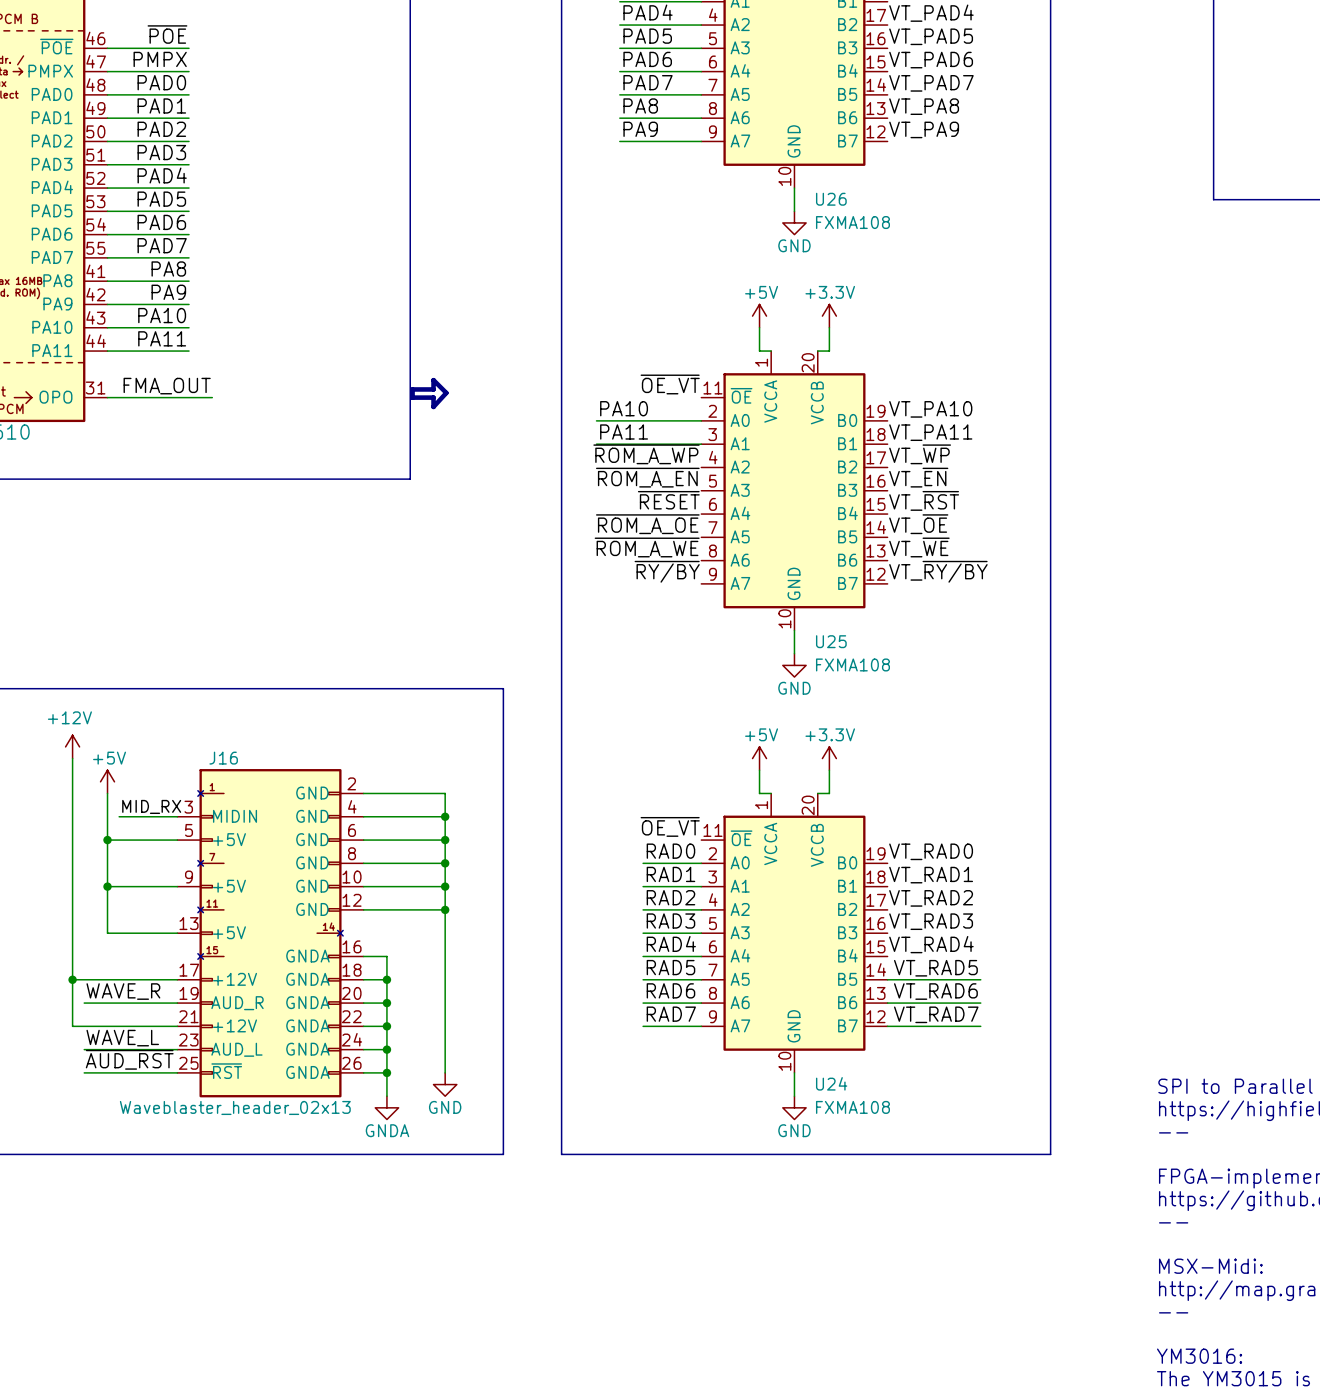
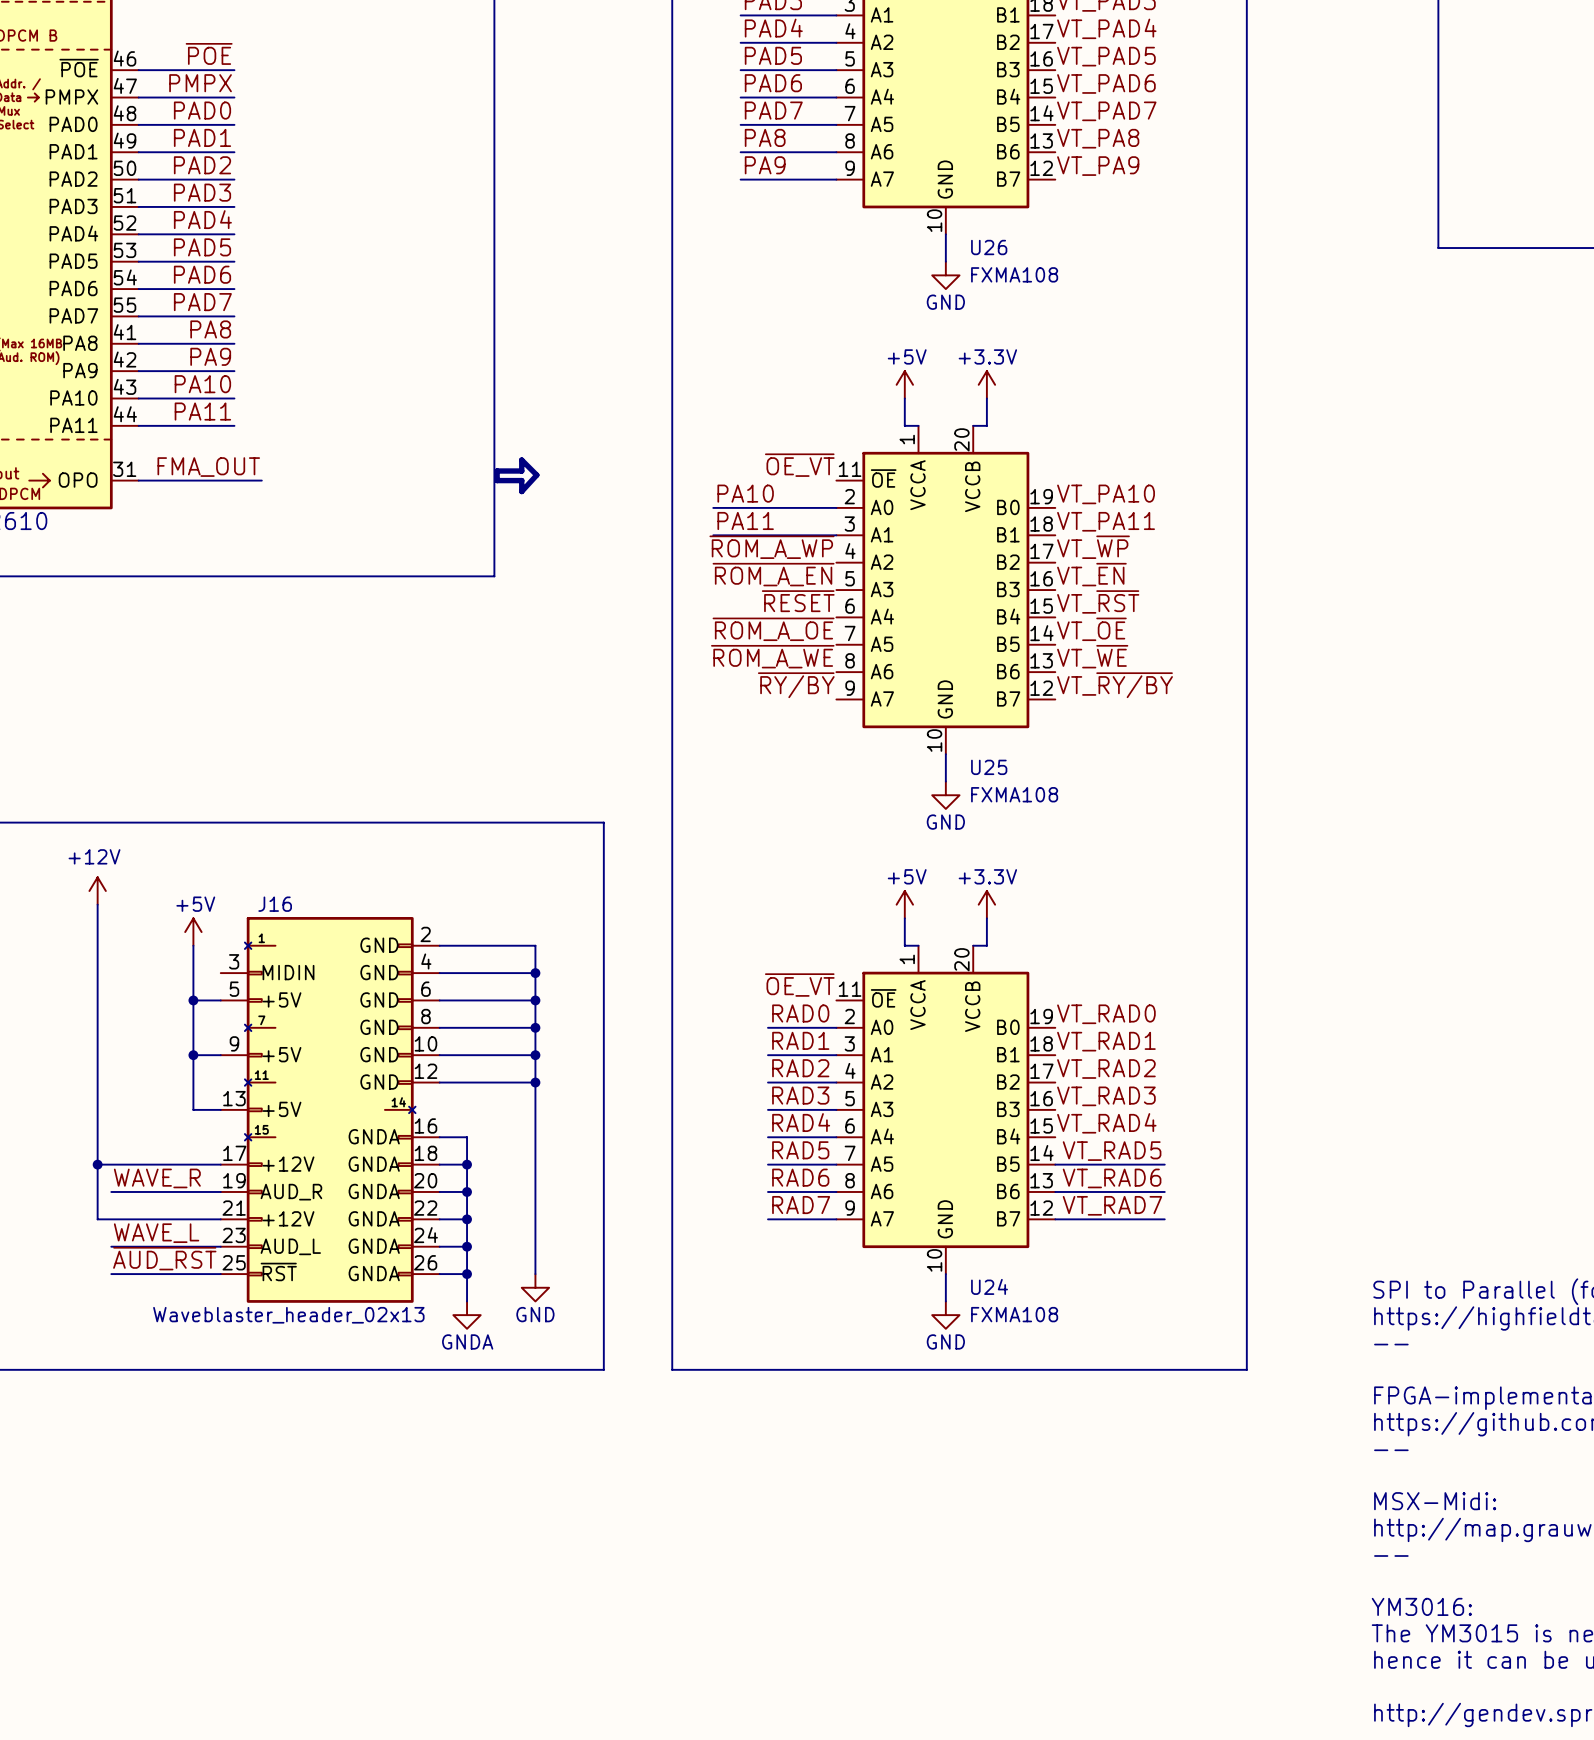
power symbol position: +5V (107, 781) -> +5V (193, 932)
wire: (107, 793) (107, 933) (154, 933) -> (193, 945) (193, 1109)
label: MID_RX (151, 806) -> none
wire: (119, 816) (177, 816) -> none
wire: (107, 840) (154, 840) -> none
junction: (107, 840) -> none
junction: none -> (193, 1000)
wire: (107, 886) (154, 886) -> none
junction: (107, 886) -> none
junction: none -> (193, 1055)

